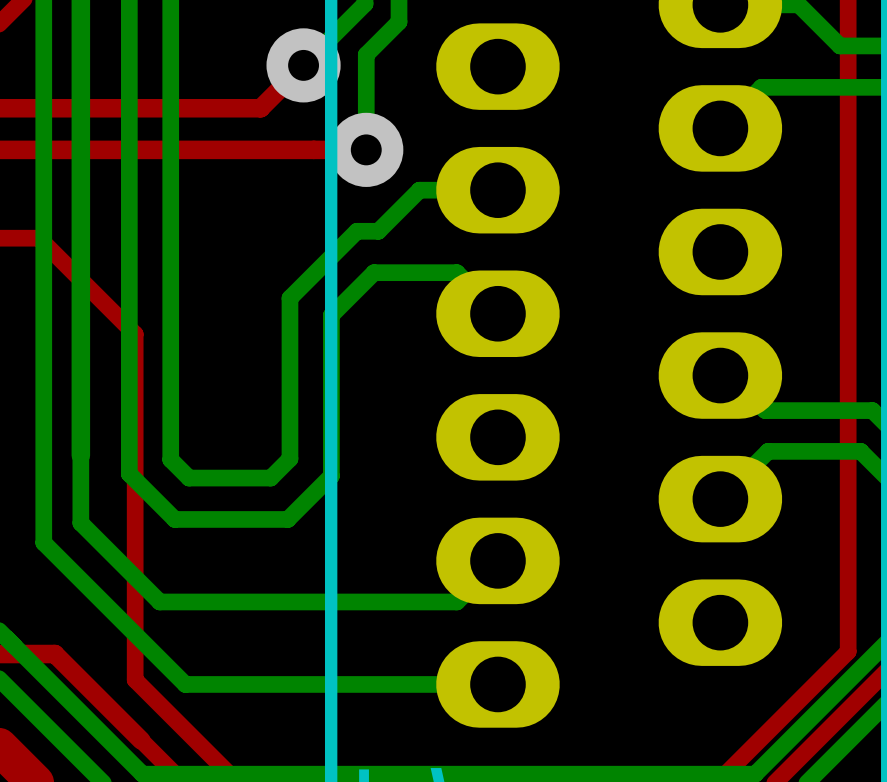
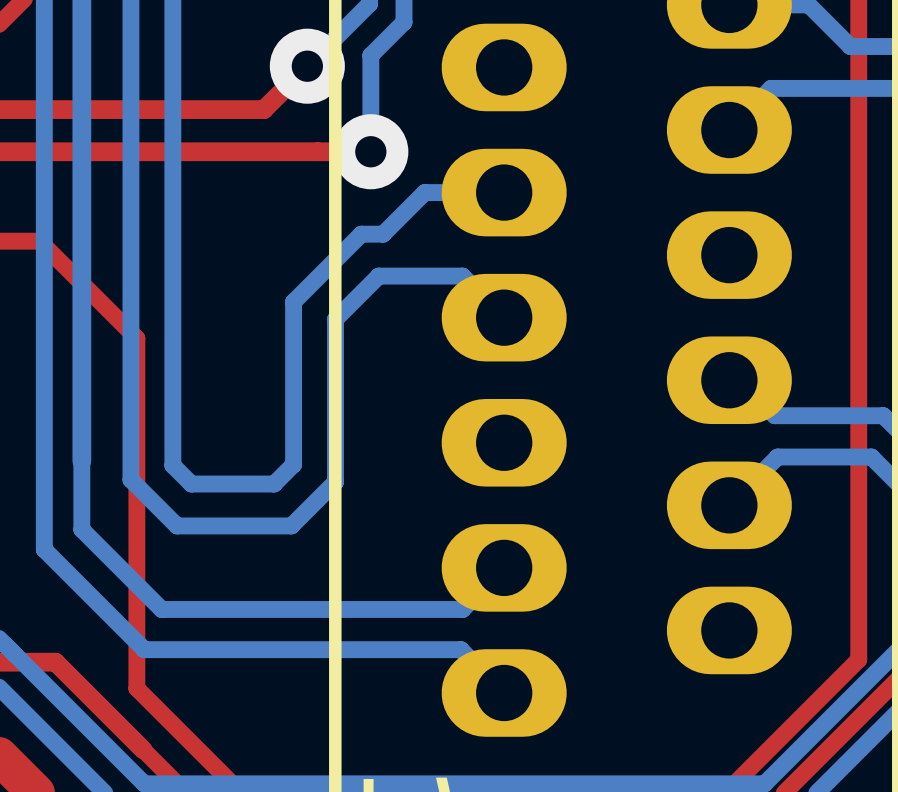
bottom track: (142, 641) (185, 684) (497, 684) -> (144, 649) (460, 649) (504, 692)

